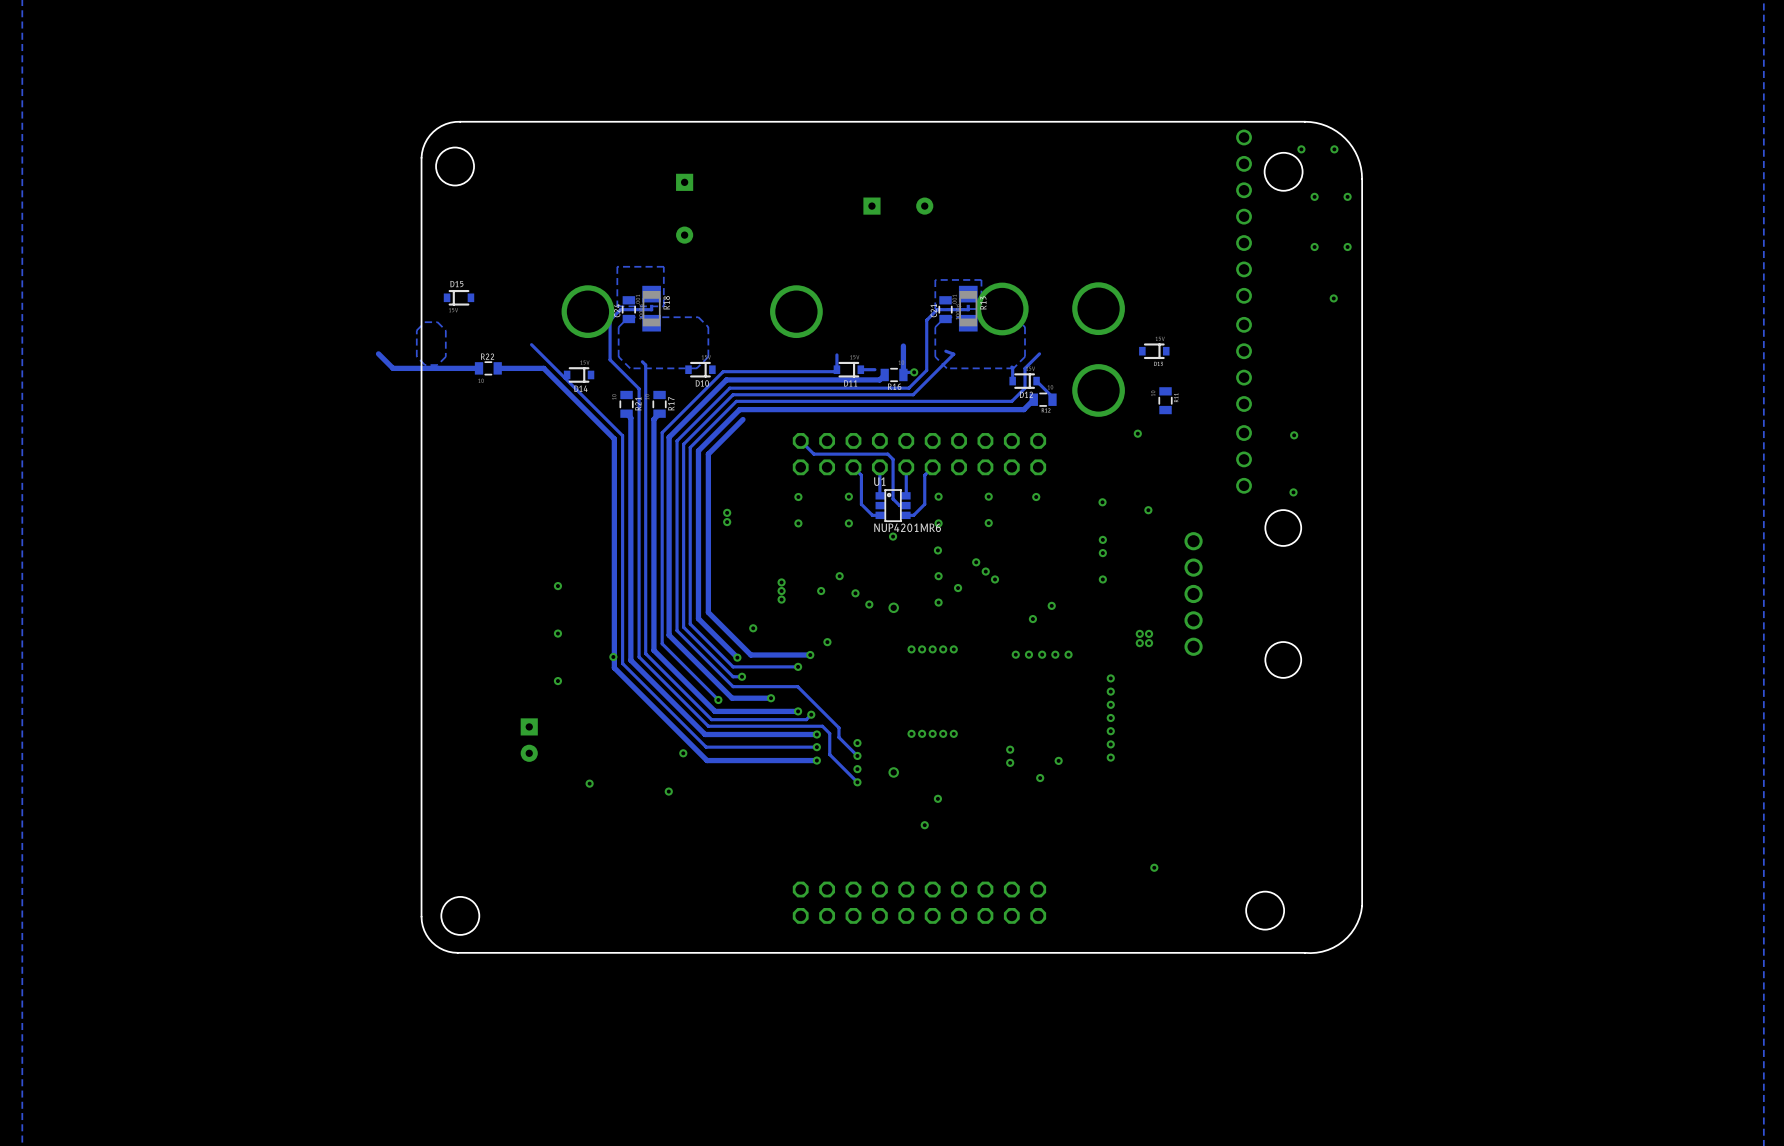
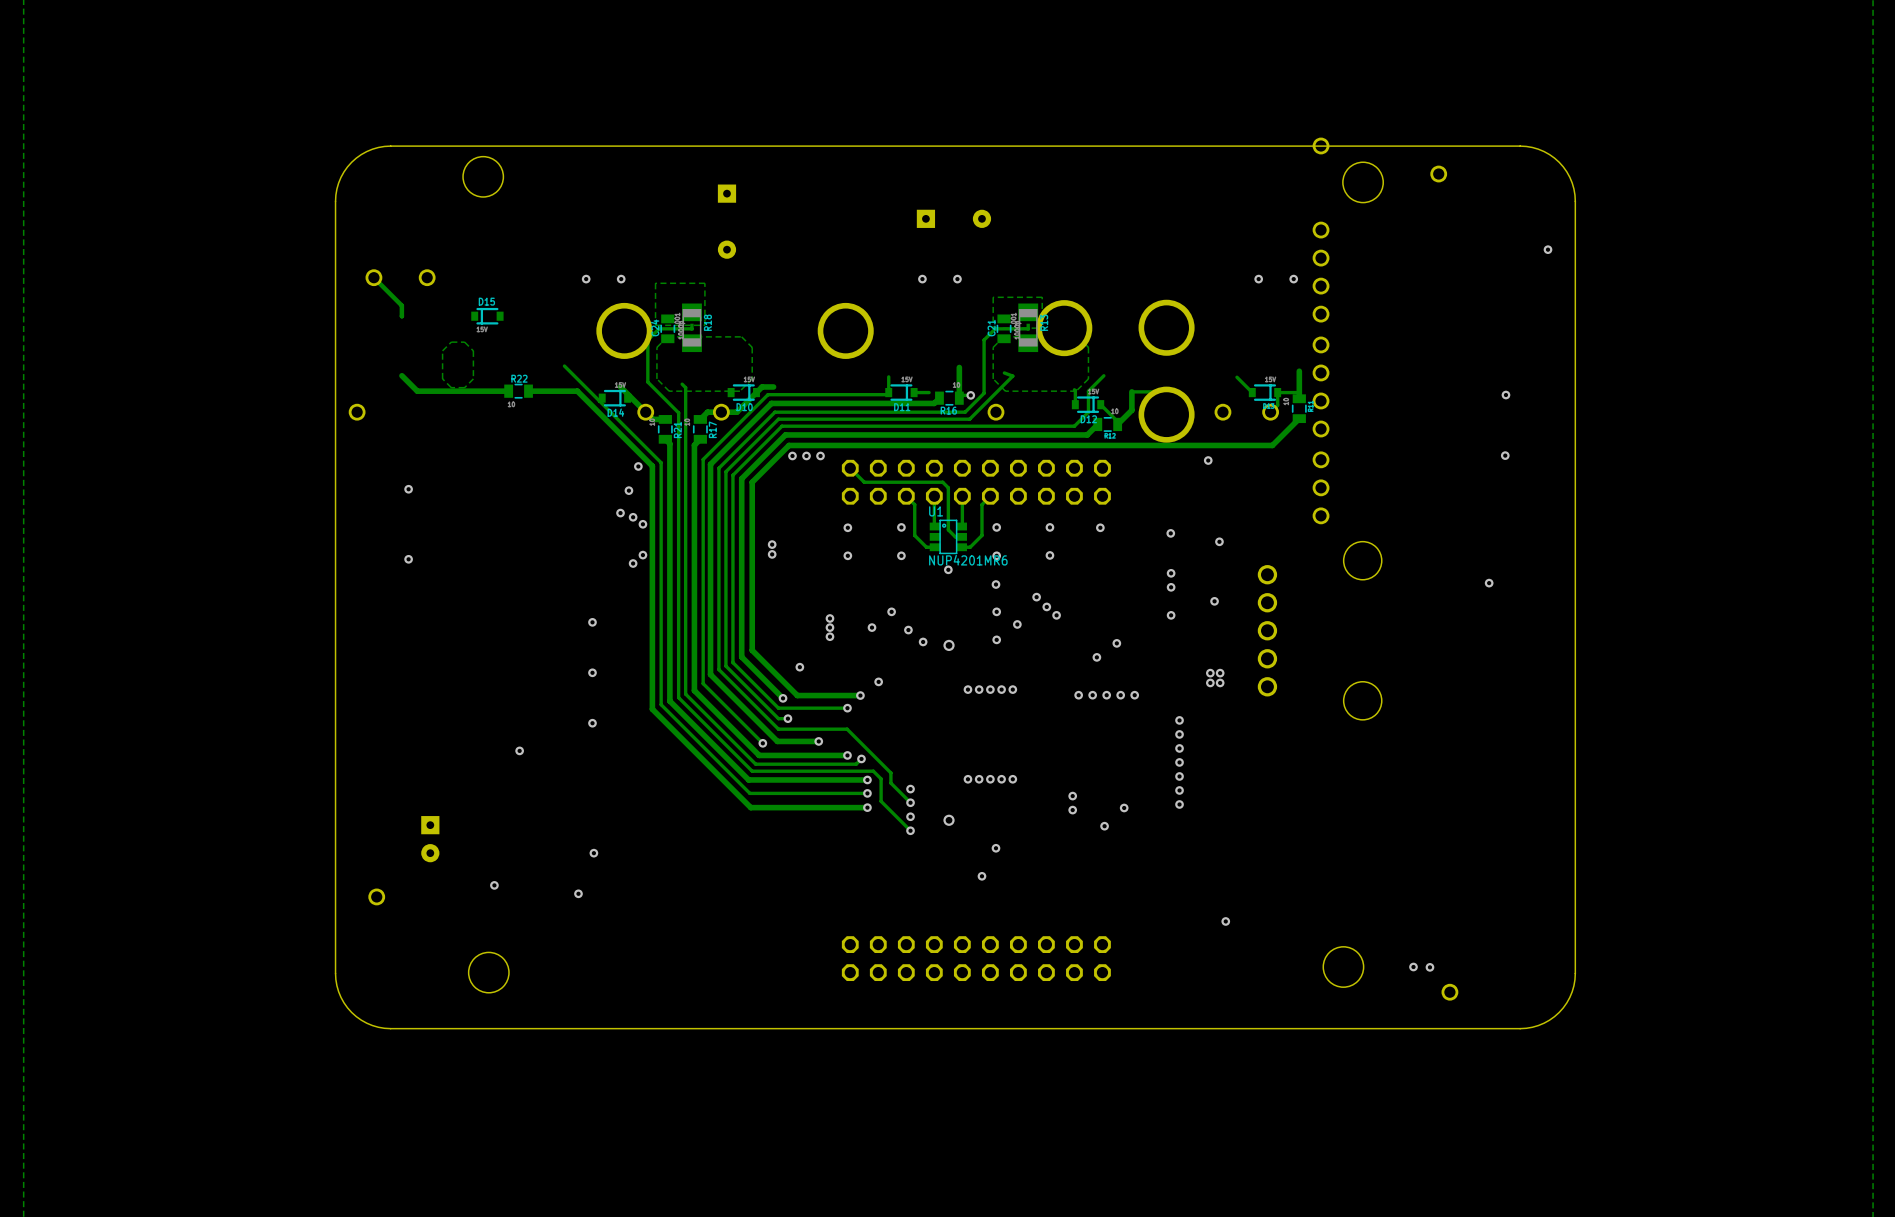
board edge: (1304, 121) (460, 121) (445, 124) (433, 131) (424, 143) (421, 157) (421, 916) (424, 930) (432, 942) (443, 950) (457, 952) (1310, 953) (1327, 950) (1347, 937) (1357, 923) (1362, 906) (1361, 173) (1355, 152) (1341, 134) (1321, 124) (1304, 121) -> (1520, 146) (1538, 149) (1559, 162) (1572, 183) (1575, 201) (1575, 973) (1569, 997) (1554, 1016) (1538, 1025) (1520, 1028) (390, 1028) (366, 1023) (347, 1007) (338, 991) (335, 973) (335, 201) (341, 177) (356, 158) (372, 149) (390, 146) (1520, 146)
via: (1301, 149) -> none
via: (1334, 149) -> none
part: (1244, 163) -> none
part: none -> (1438, 174)
part: (1244, 190) -> none
via: (1314, 196) -> none
via: (1347, 196) -> none
via: none -> (1548, 249)
via: (1314, 246) -> none
via: (1347, 246) -> none
track: none -> (373, 277) (401, 305) (401, 316)
part: none -> (373, 277)
part: none -> (427, 277)
via: none -> (586, 279)
via: none -> (621, 279)
via: none -> (922, 279)
via: none -> (957, 279)
via: none -> (1258, 279)
via: none -> (1293, 279)
via: (1333, 298) -> none
track: none -> (1299, 371) (1299, 398) (1298, 392) (1277, 392) (1277, 405) (1270, 412)
part position: (1154, 351) -> (1264, 392)
track: none -> (1236, 377) (1252, 392)
track: none -> (620, 386) (652, 419) (665, 419)
track: none -> (773, 386) (762, 386) (736, 412) (707, 412) (700, 419)
via: none -> (1505, 395)
part: none -> (357, 412)
part: none -> (645, 412)
part: none -> (721, 412)
part: none -> (995, 412)
track: none -> (1175, 412) (1155, 391) (1131, 391) (1131, 410) (1117, 424)
part: none -> (1222, 412)
part: none -> (1270, 412)
track: none -> (1299, 418) (1272, 445) (788, 445)
part position: (1165, 400) -> (1299, 408)
via: none -> (792, 455)
via: none -> (806, 455)
via: none -> (820, 455)
via: none -> (1505, 455)
via: (1294, 435) -> none
via: none -> (638, 466)
via: none -> (408, 489)
via: none -> (628, 490)
via: none -> (620, 513)
via: none -> (633, 517)
via: (1293, 492) -> none
via: none -> (642, 524)
via: none -> (642, 555)
via: none -> (408, 559)
via: none -> (633, 563)
via: none -> (1489, 583)
via: none -> (1214, 601)
via: (613, 656) -> none
via: none -> (519, 750)
part position: (529, 740) -> (430, 839)
via: (683, 753) -> none
via position: (589, 783) -> (593, 853)
via: (668, 791) -> none
via: none -> (494, 885)
via: none -> (578, 893)
part: none -> (376, 896)
via: none -> (1413, 967)
via: none -> (1429, 967)
part: none -> (1449, 992)

